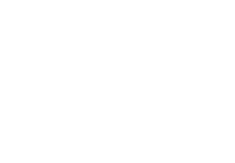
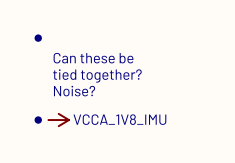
junction: none -> (38, 38)
text: none -> Can these be (93, 58)
text: none -> tied together? (97, 76)
text: none -> Noise? (74, 91)
junction: none -> (38, 120)
power symbol: none -> VCCA_1V8_IMU (58, 120)

